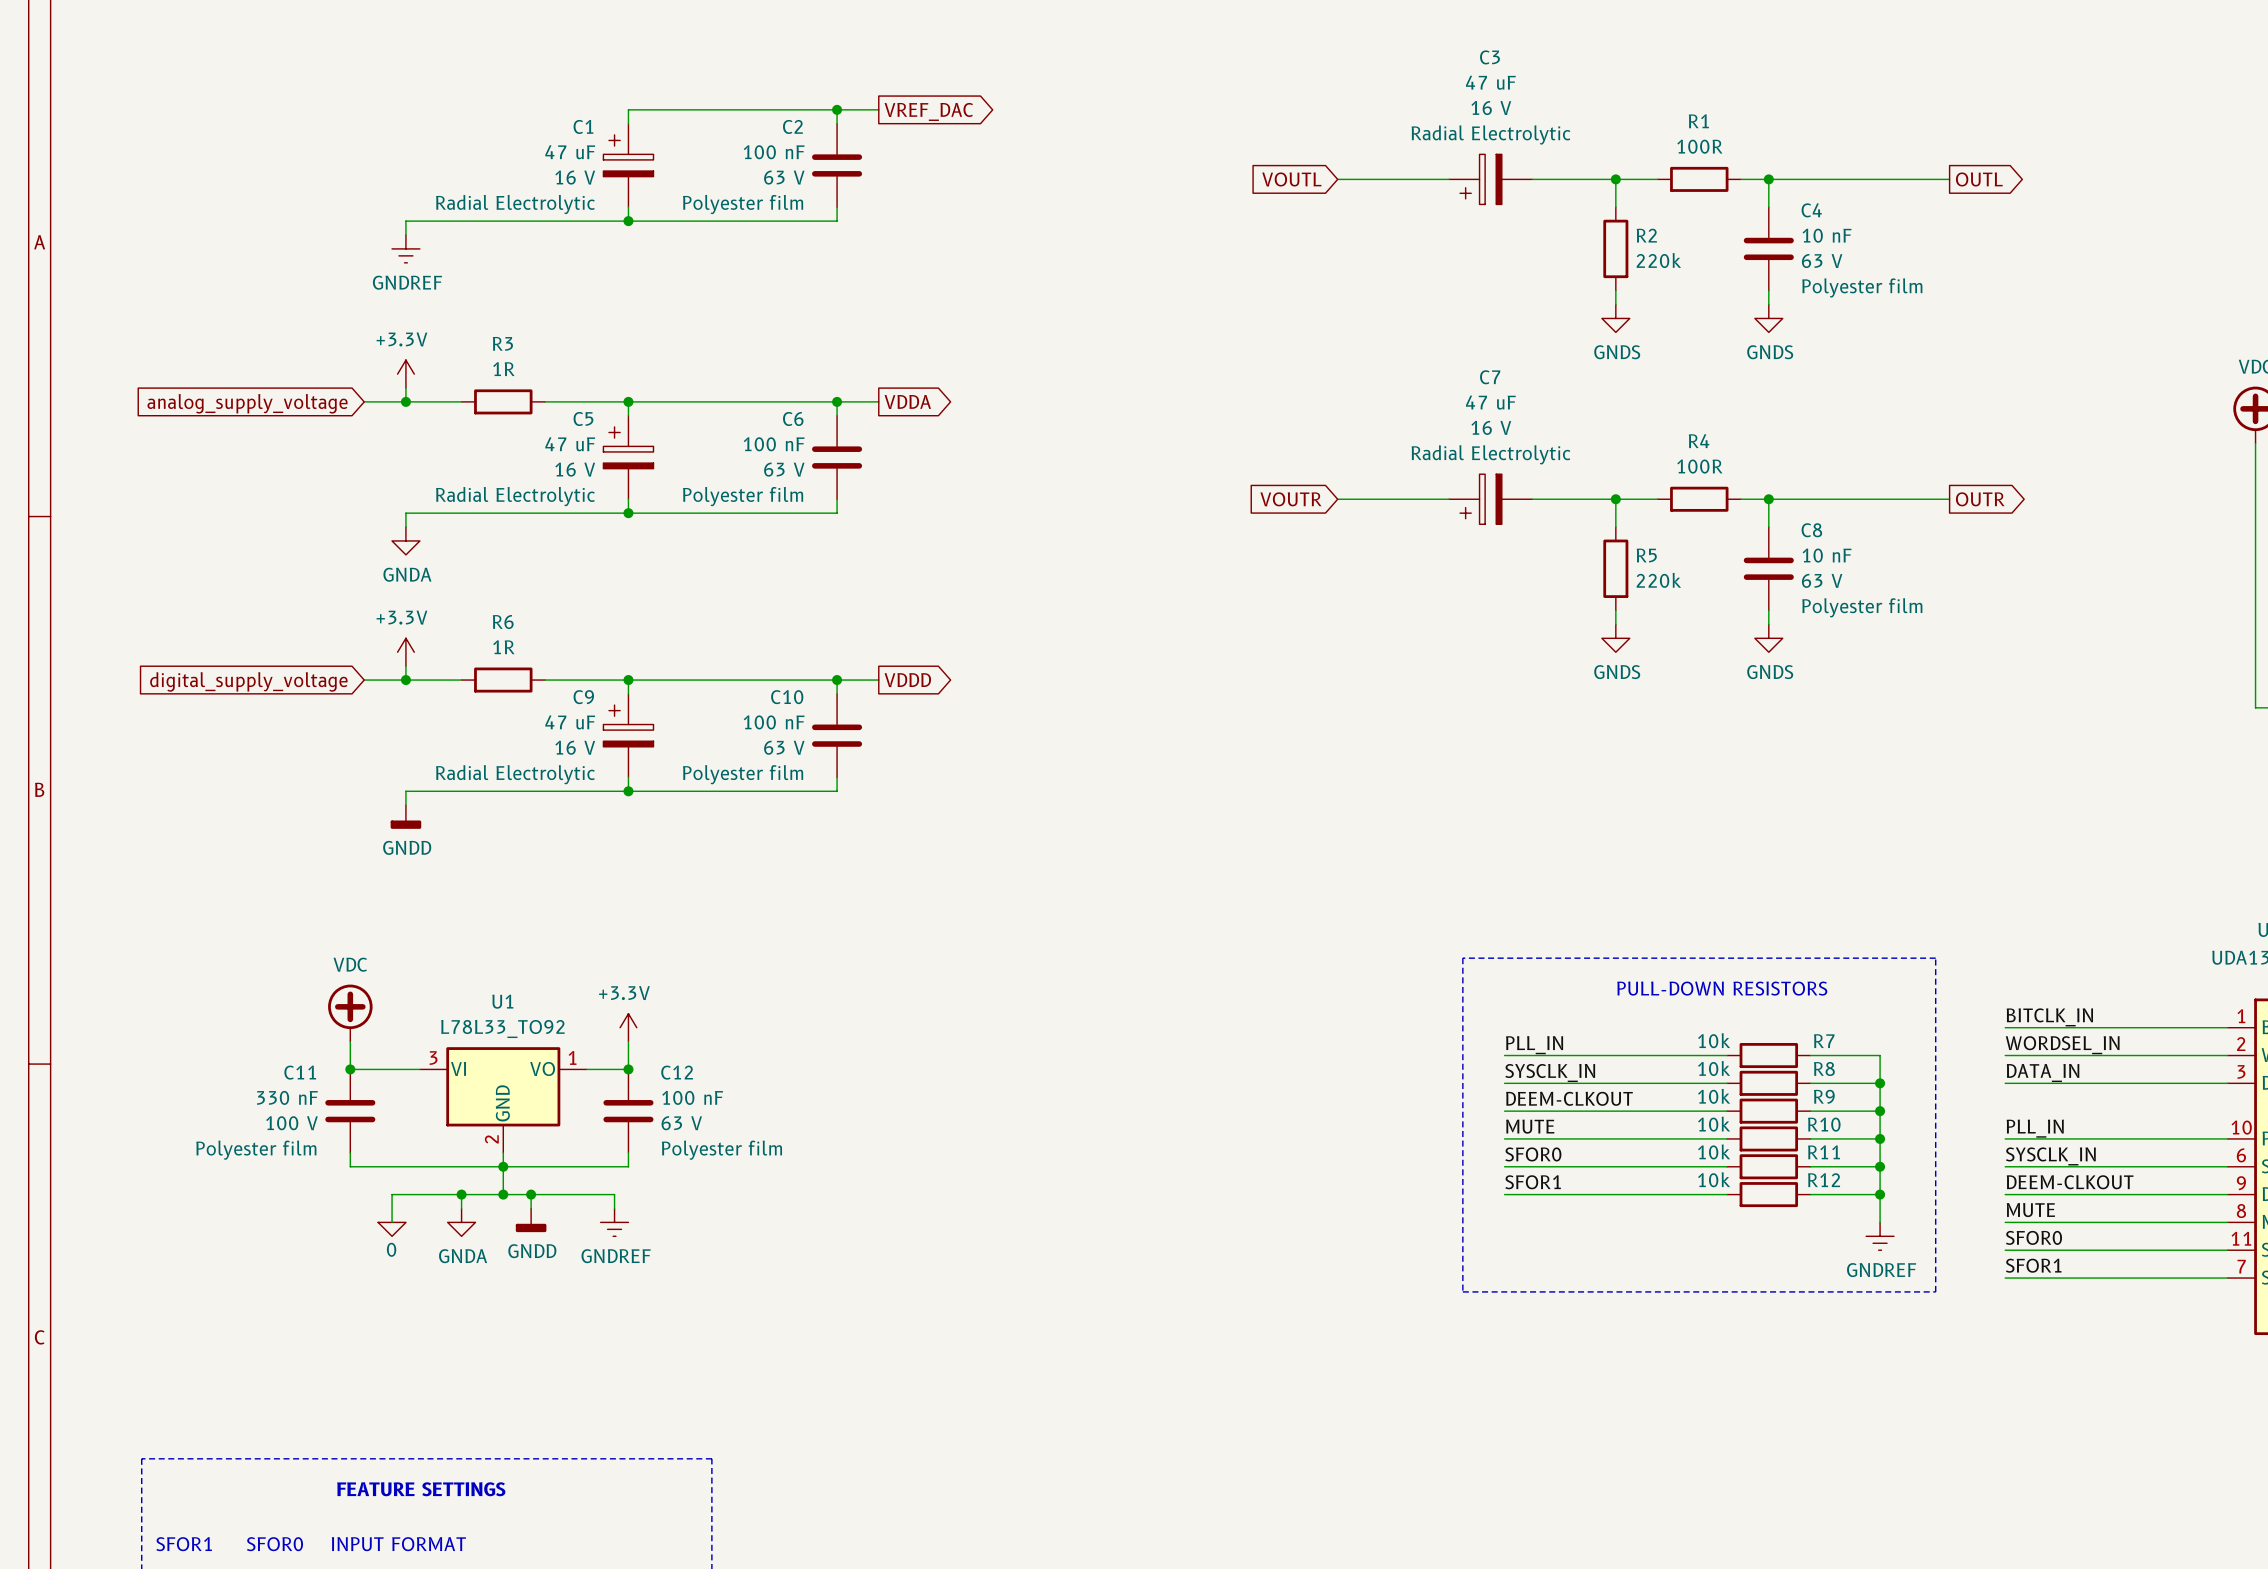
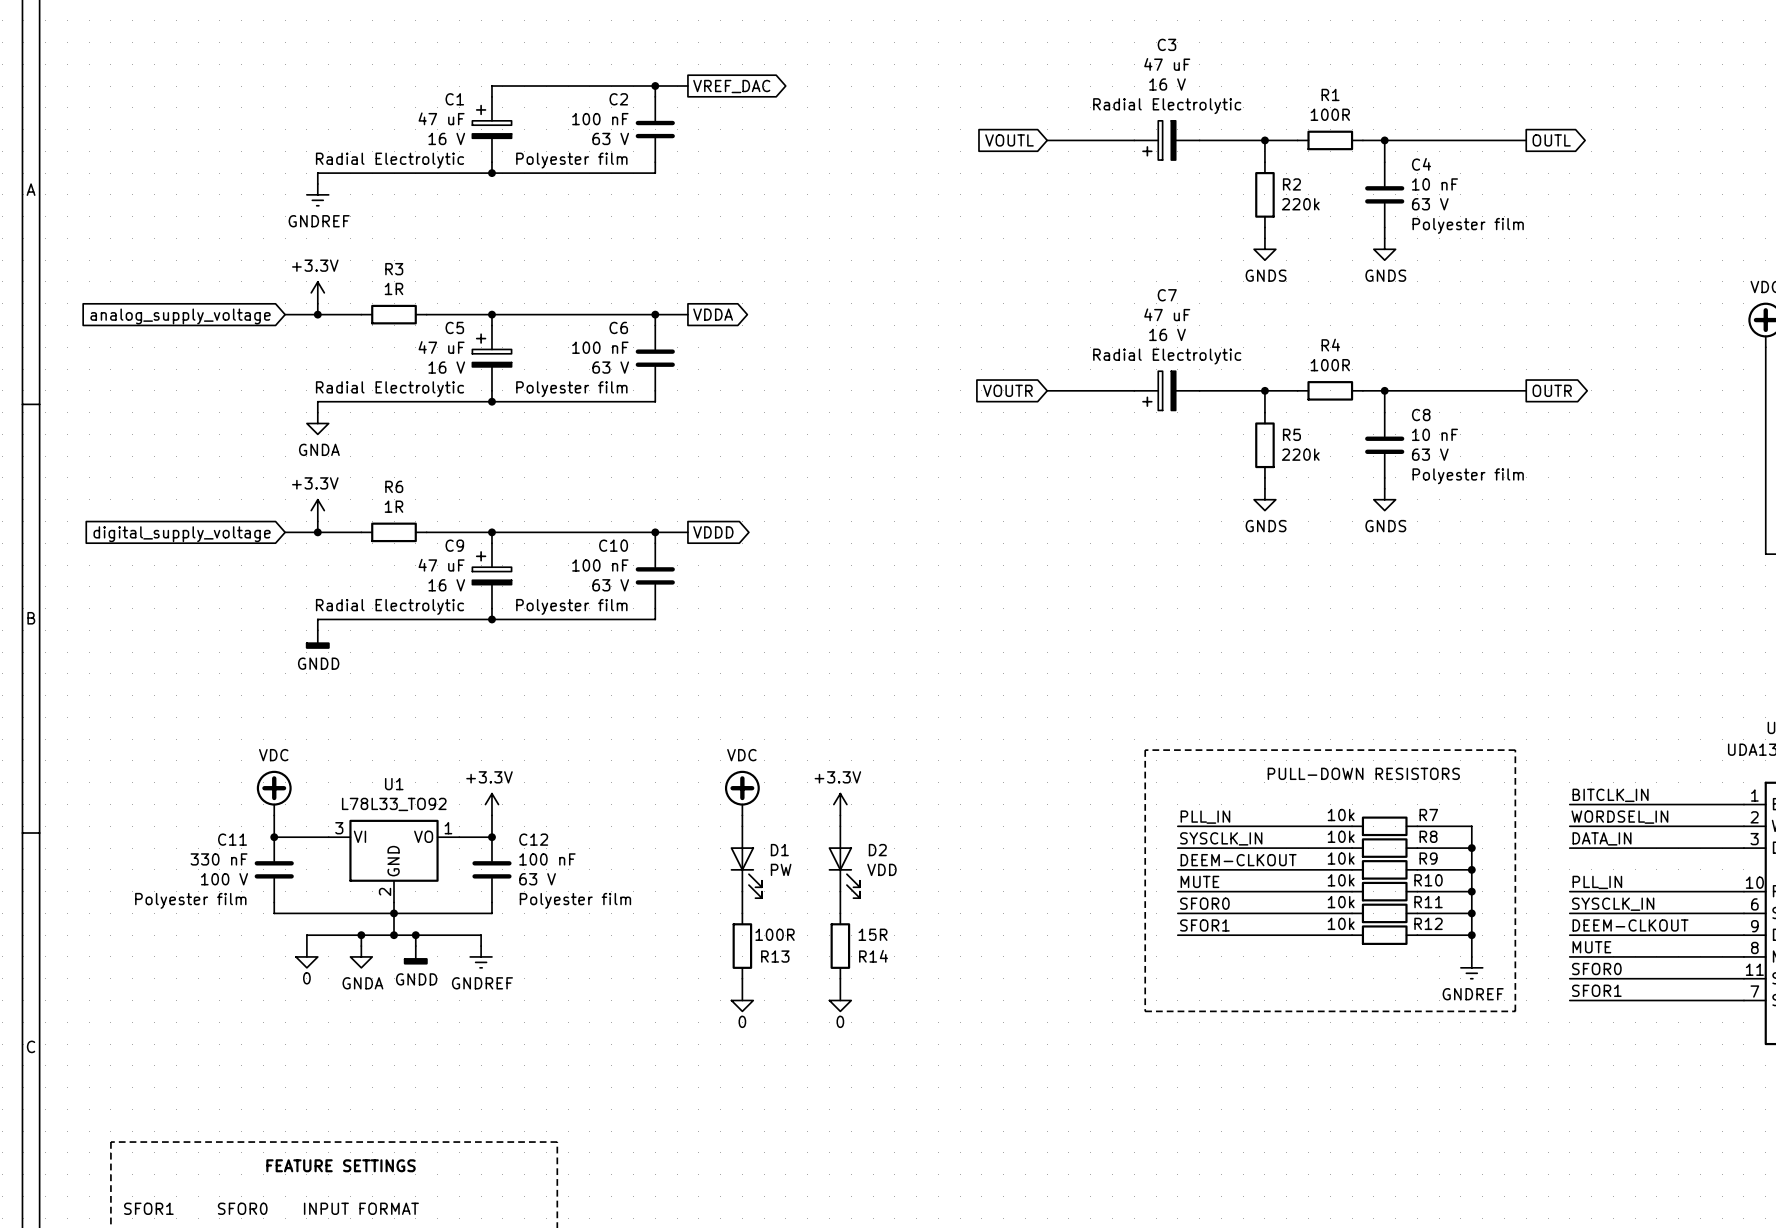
power symbol: none -> VDC (742, 793)
power symbol: none -> +3.3V (840, 804)
wire: none -> (742, 815) (742, 826)
wire: none -> (840, 815) (840, 826)
D1: none -> PW (746, 862)
D2: none -> VDD (844, 862)
wire: none -> (742, 891) (742, 913)
wire: none -> (840, 891) (840, 913)
R13: none -> 100R (742, 946)
R14: none -> 15R (840, 946)
wire: none -> (742, 978) (742, 1000)
wire: none -> (840, 978) (840, 1000)
power symbol: none -> 0 (742, 1005)
power symbol: none -> 0 (840, 1005)

